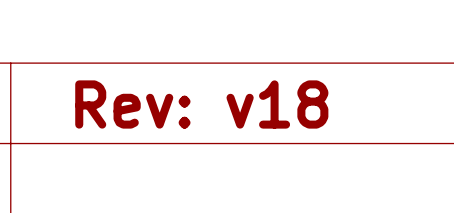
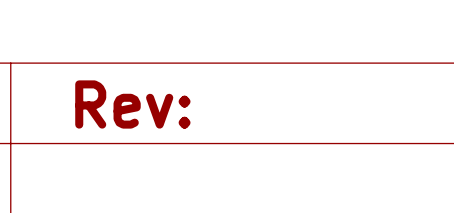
title block: Rev: v18 (201, 104) -> Rev: (132, 104)

